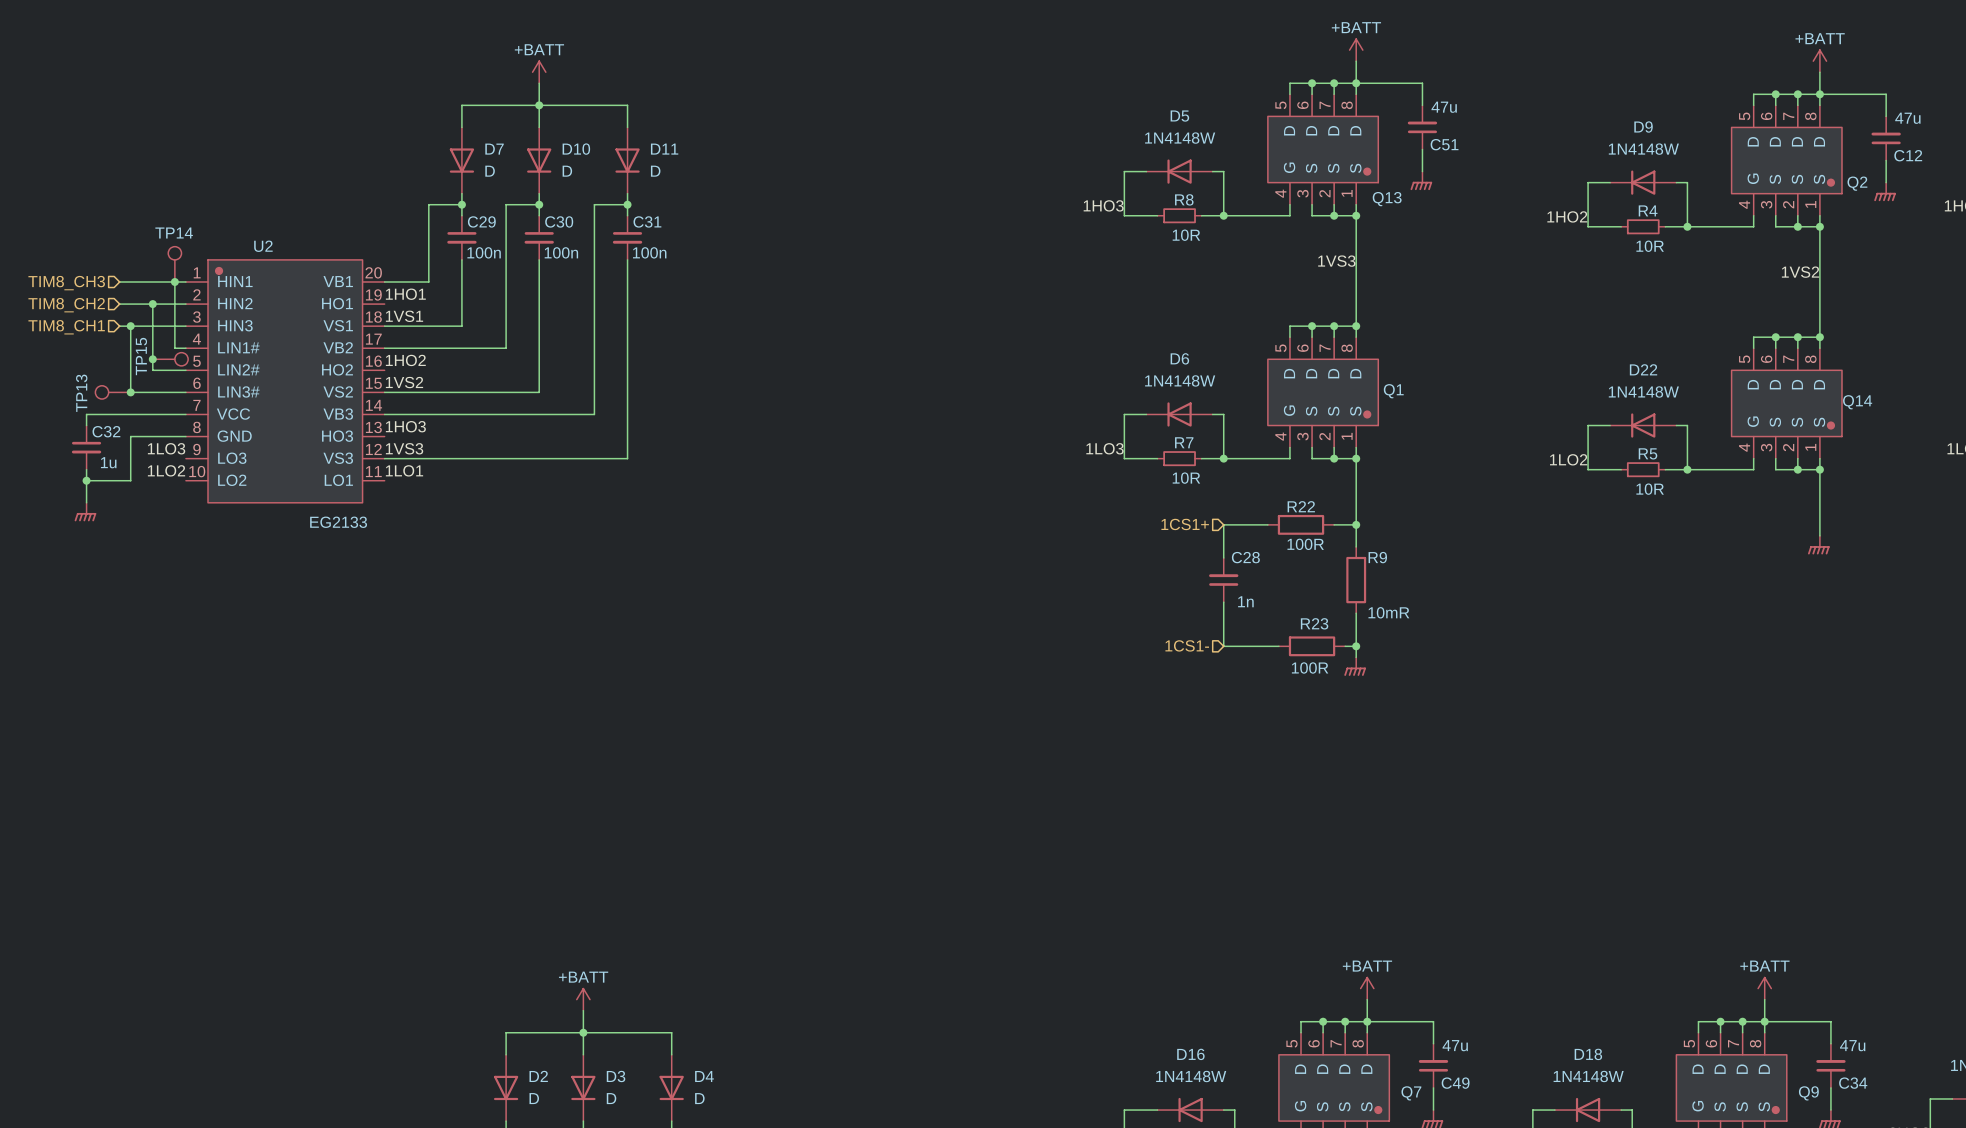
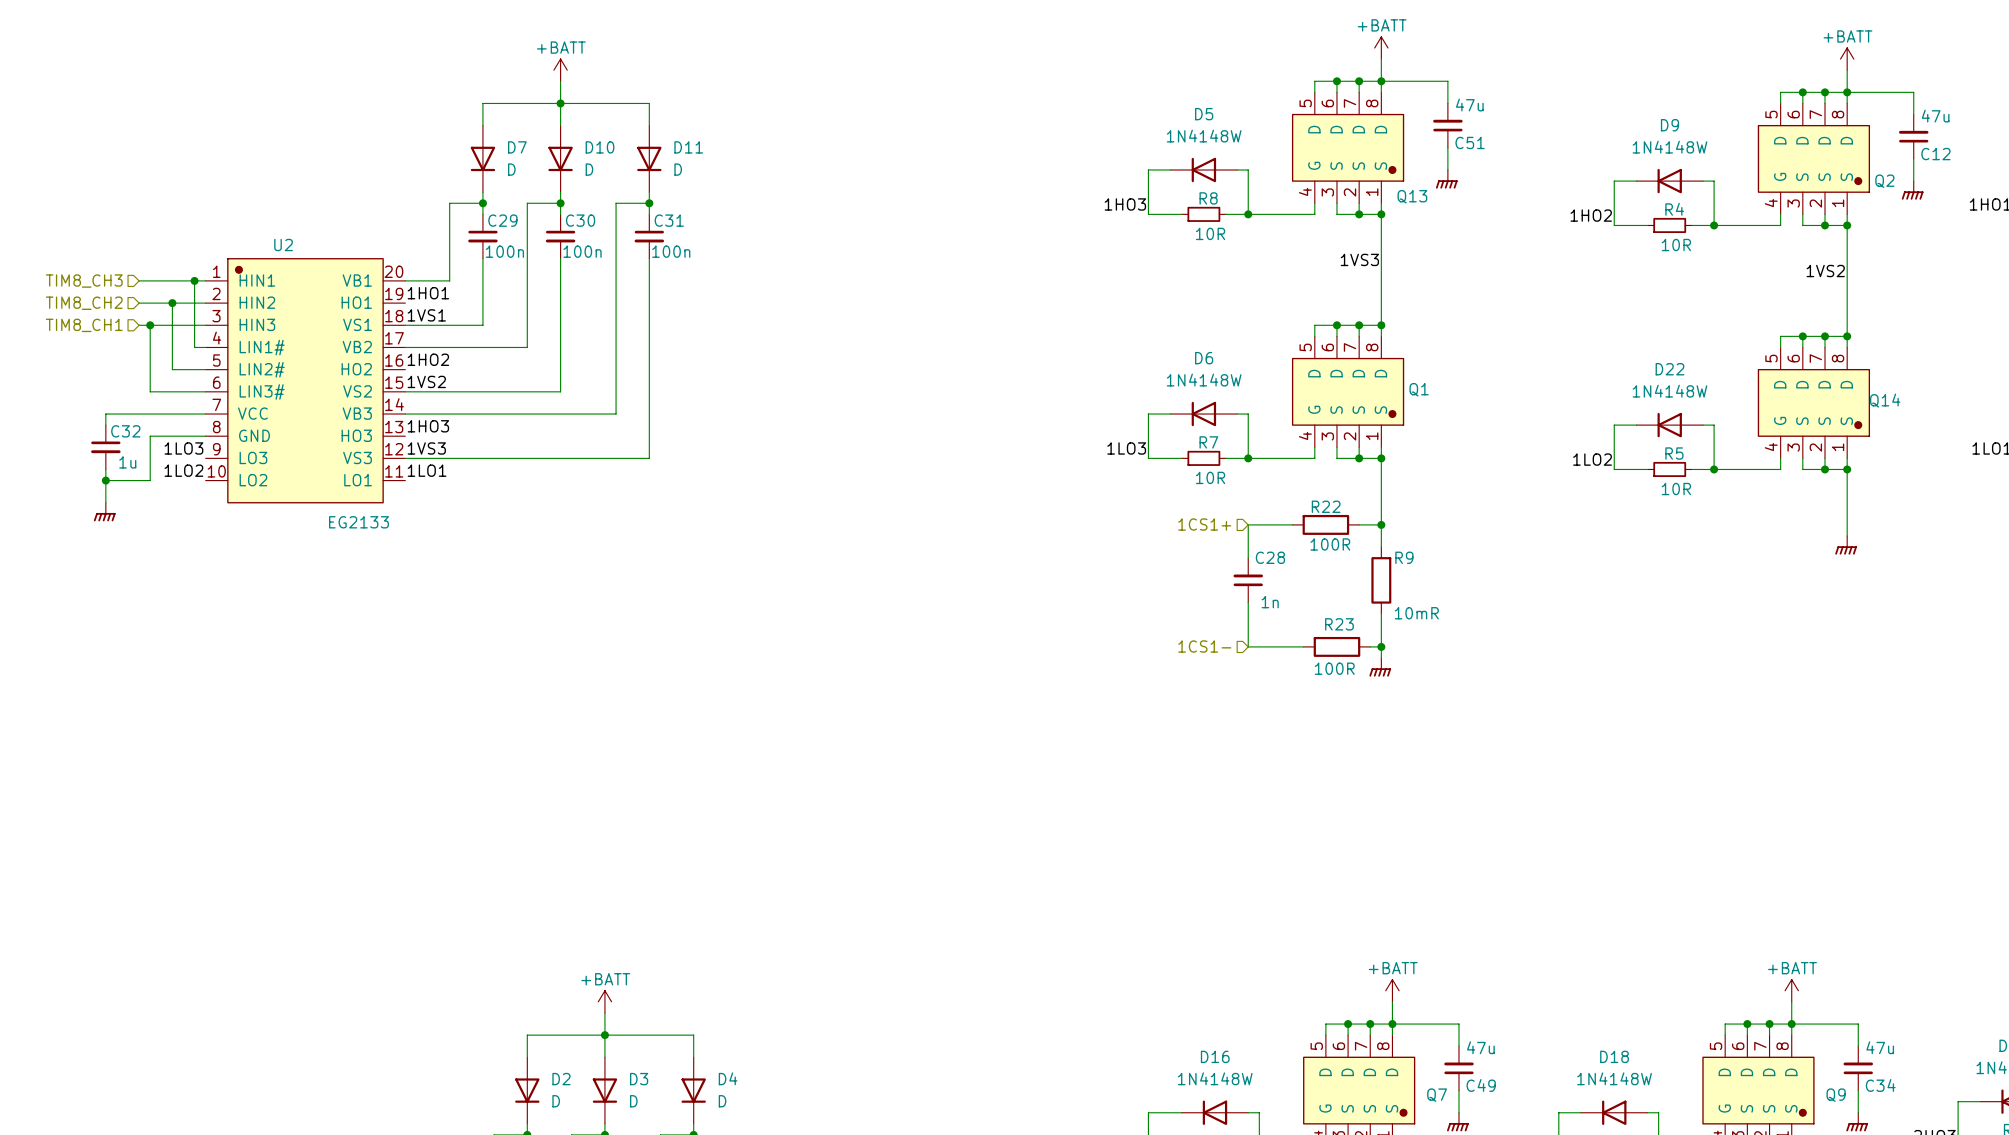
TP14: (174, 264) -> none
junction: (152, 359) -> none
TP15: (170, 359) -> none
TP13: (113, 392) -> none
junction: (130, 392) -> none

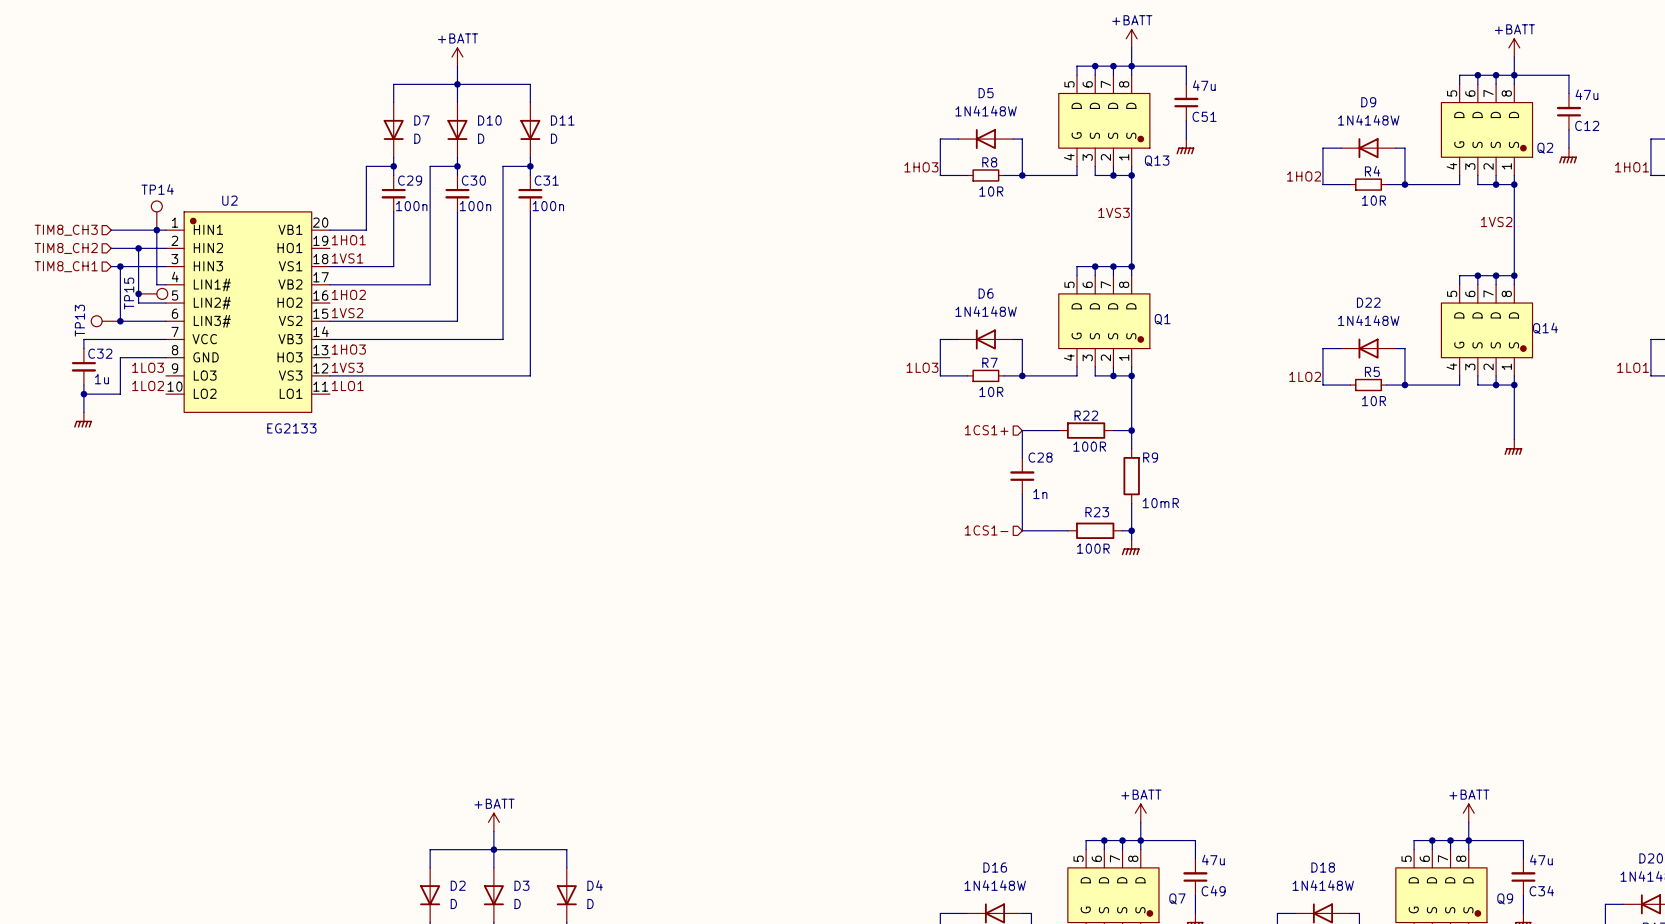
TP14: none -> (156, 215)
junction: none -> (138, 293)
TP15: none -> (153, 293)
TP13: none -> (105, 321)
junction: none -> (120, 321)

